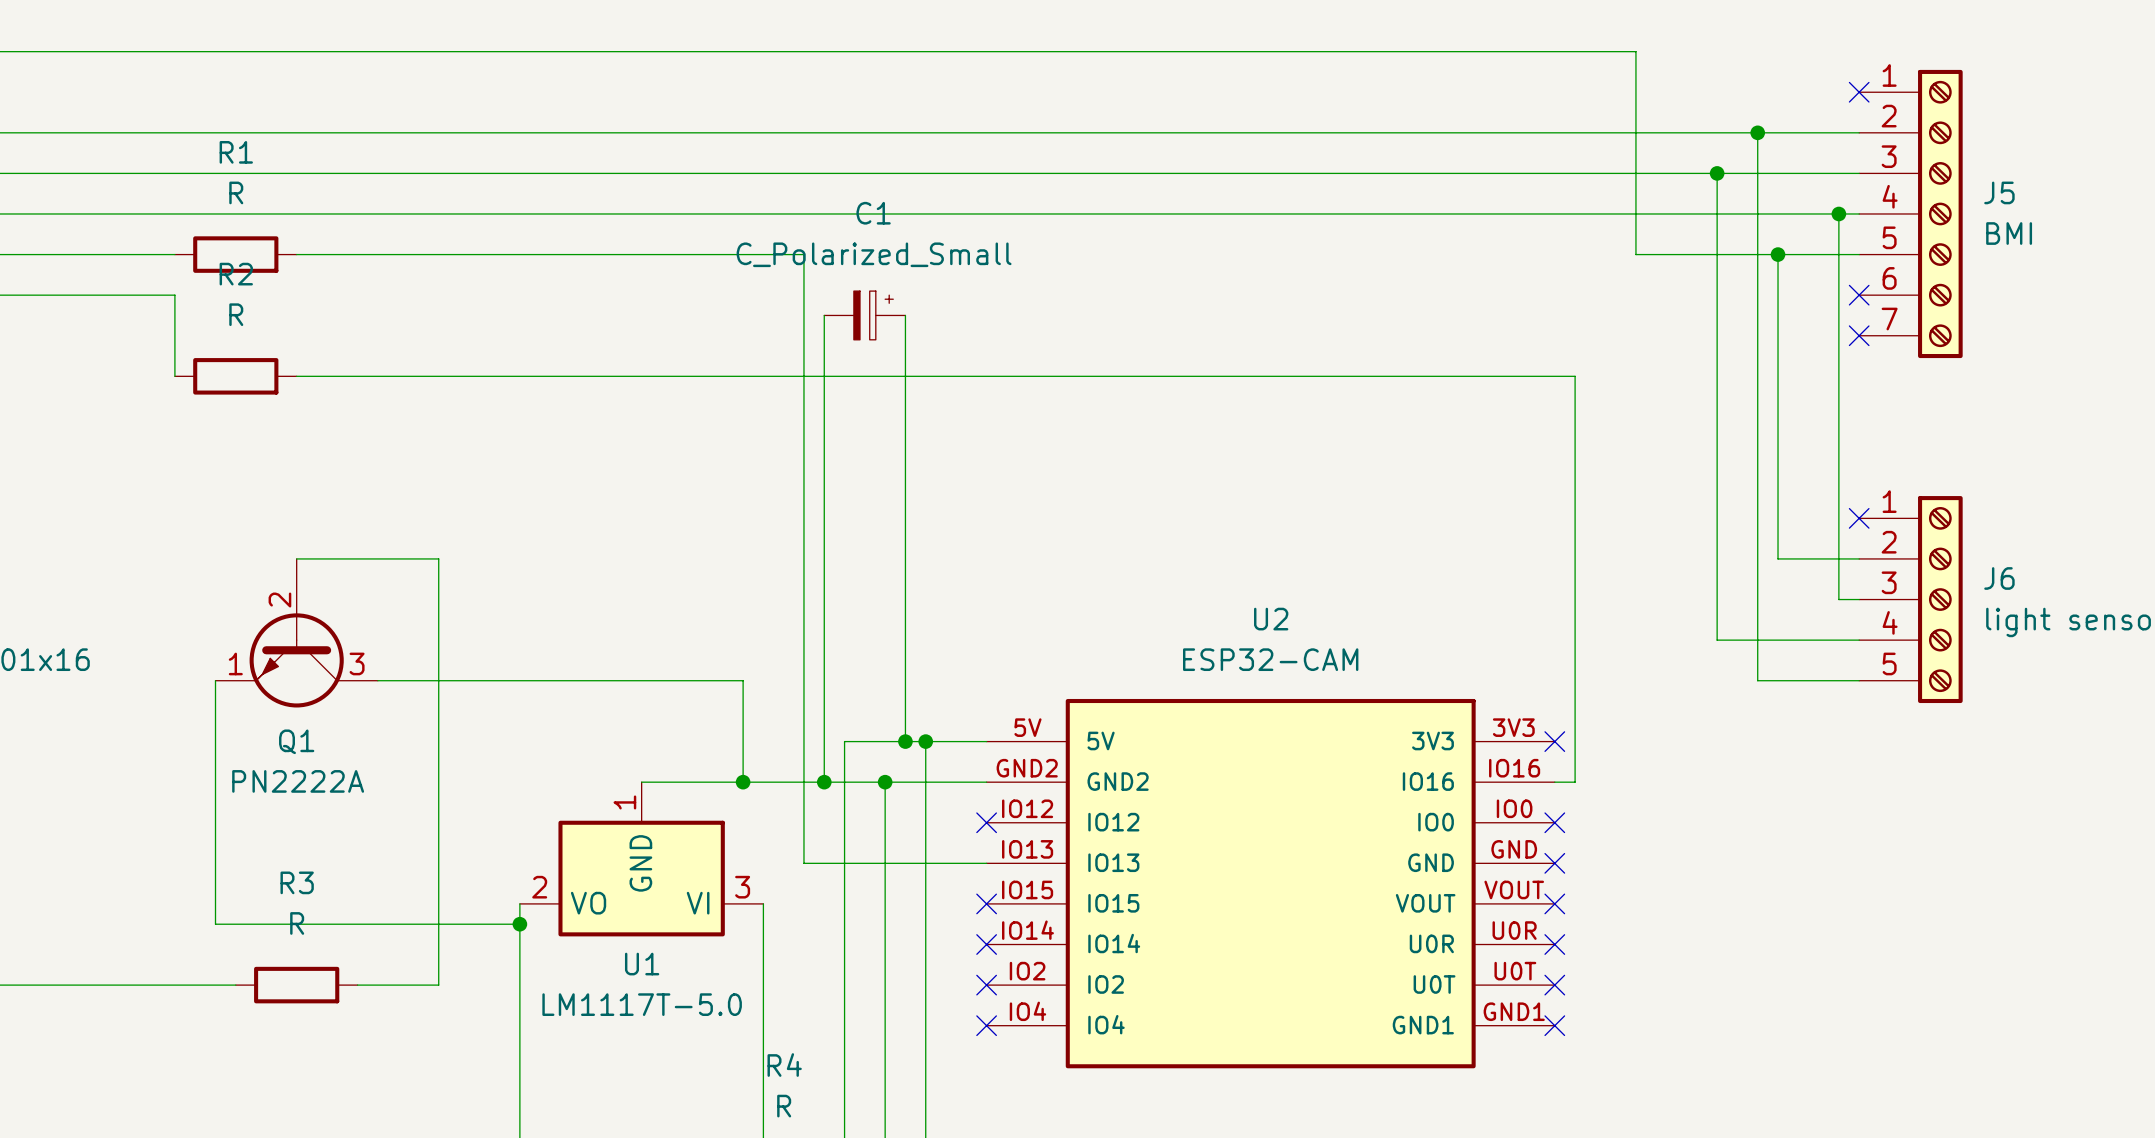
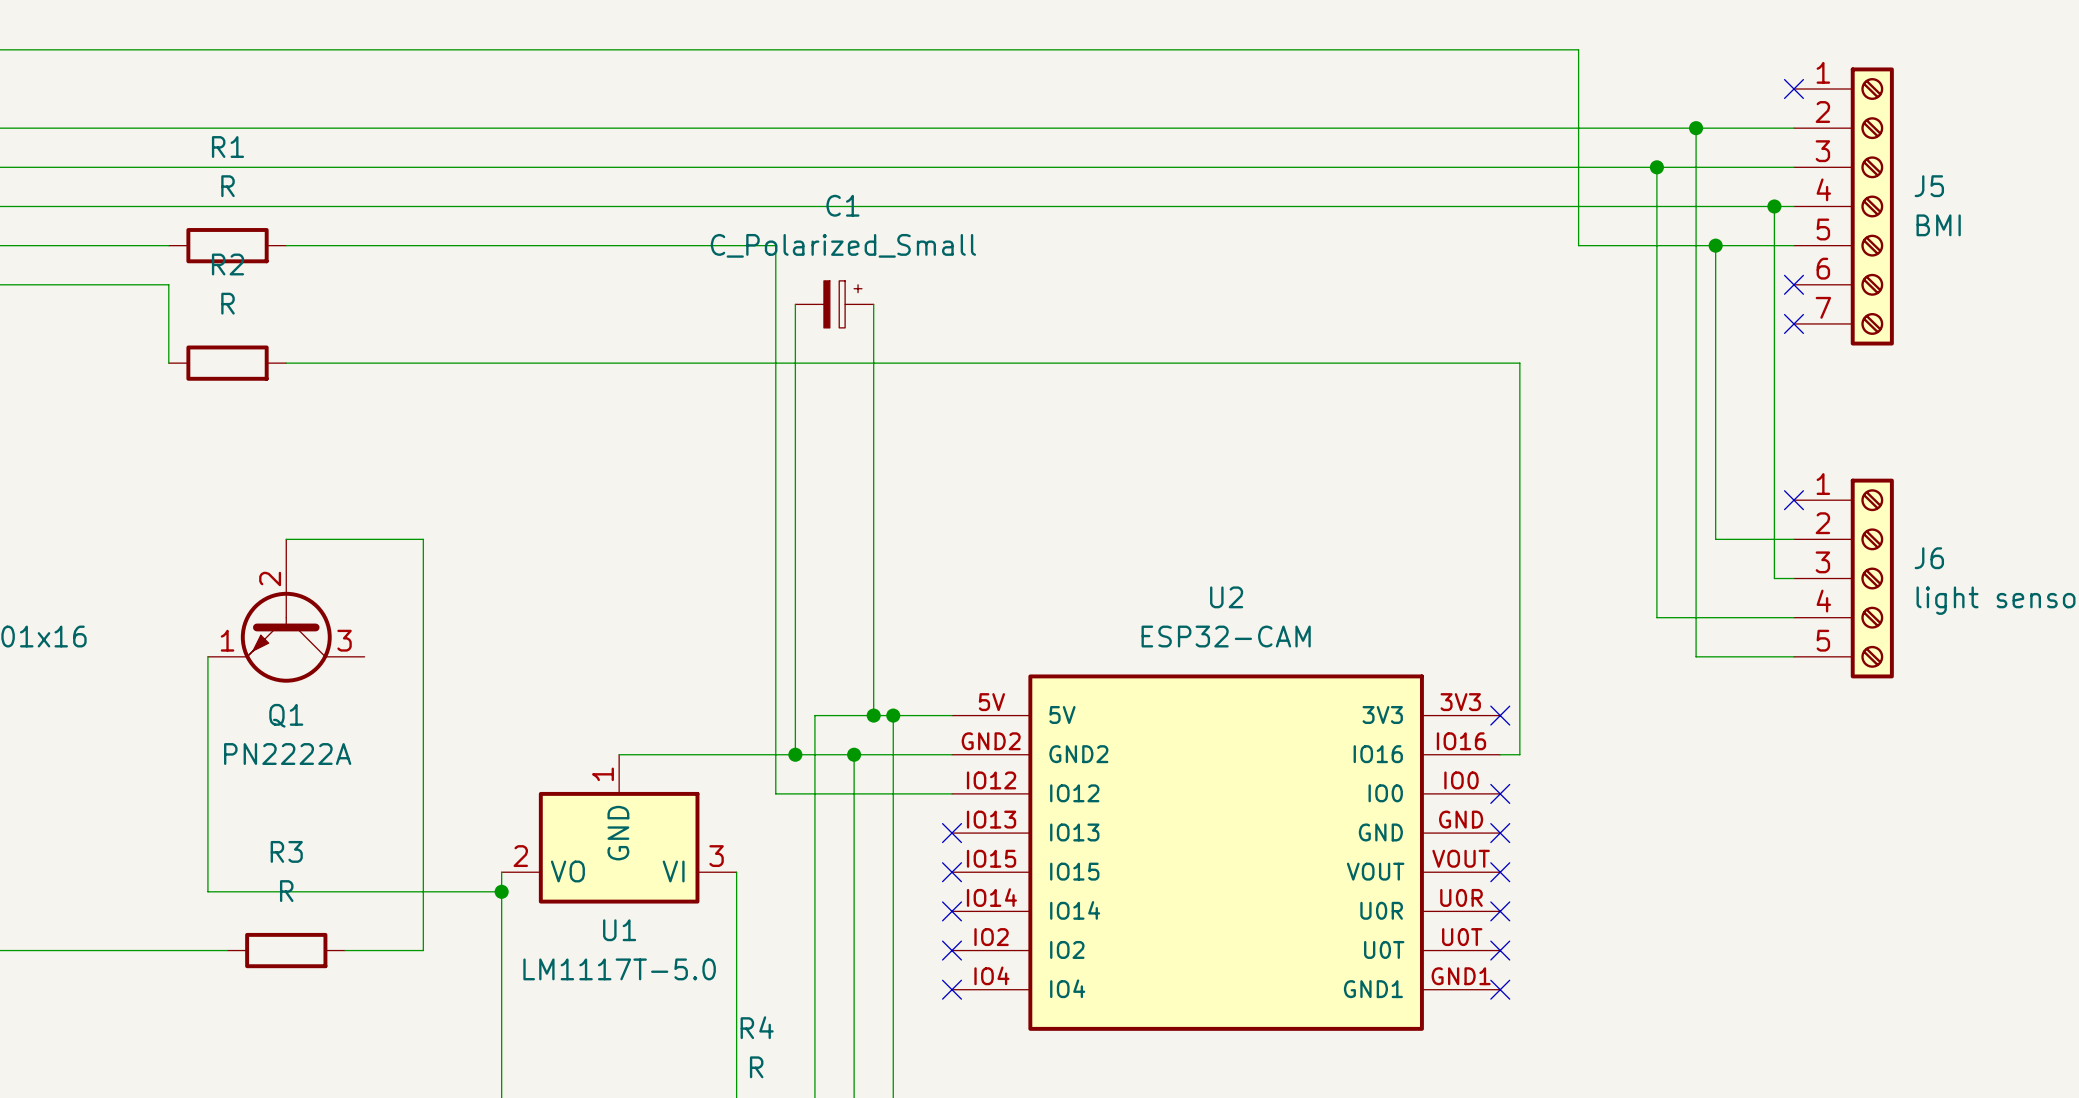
wire: (377, 680) (743, 680) (743, 782) -> none
junction: (743, 782) -> none
wire: (803, 822) (803, 863) (986, 863) -> (775, 793) (952, 793)
no-connect mark position: (986, 822) -> (952, 833)

